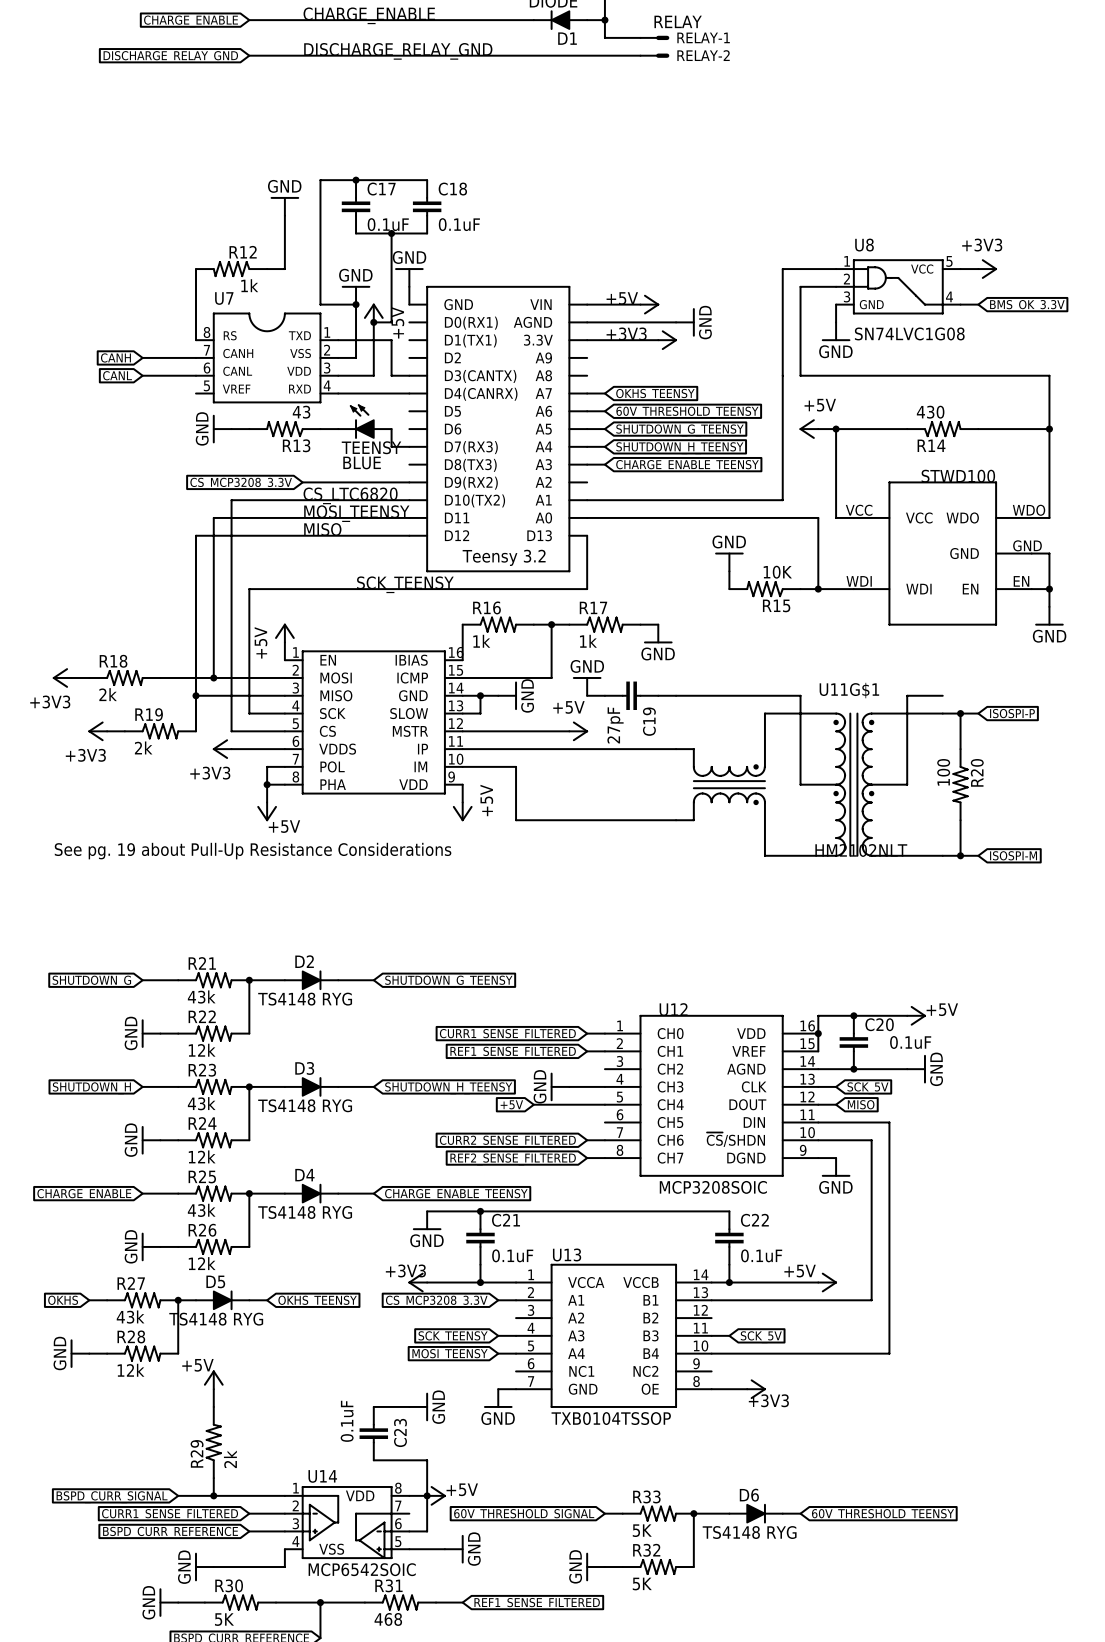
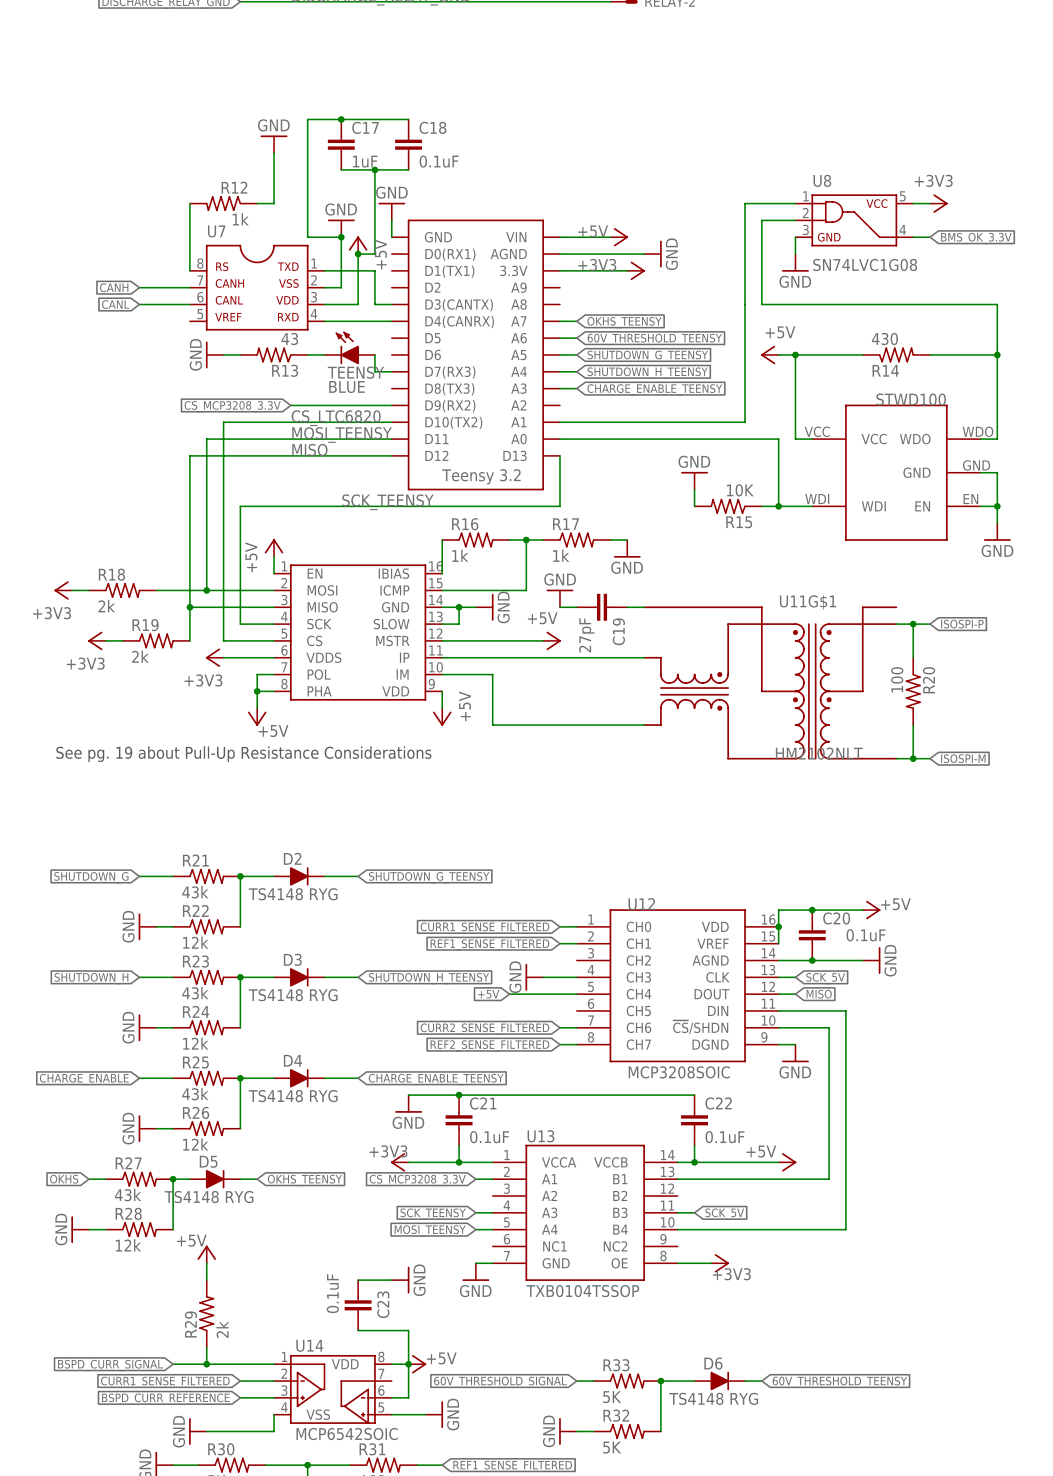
C17 value: 0.1uF (388, 224) -> 1uF (365, 161)

